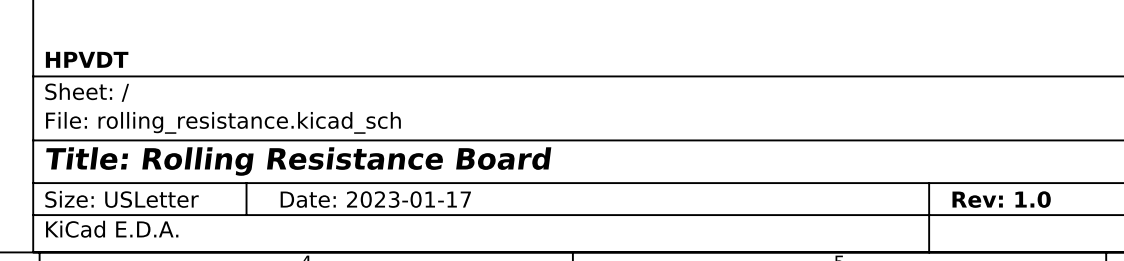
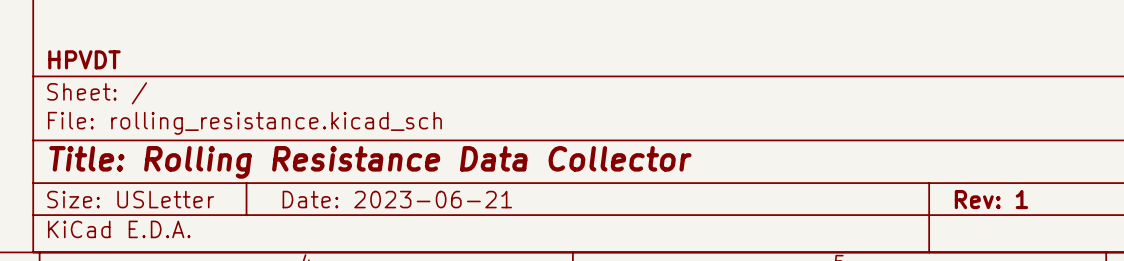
title block: Title: Rolling Resistance Board (298, 161) -> Title: Rolling Resistance Data Collector (370, 162)
title block: Date: 2023-01-17 (375, 199) -> Date: 2023-06-21 (397, 199)
title block: Rev: 1.0 (1001, 199) -> Rev: 1 (991, 199)

